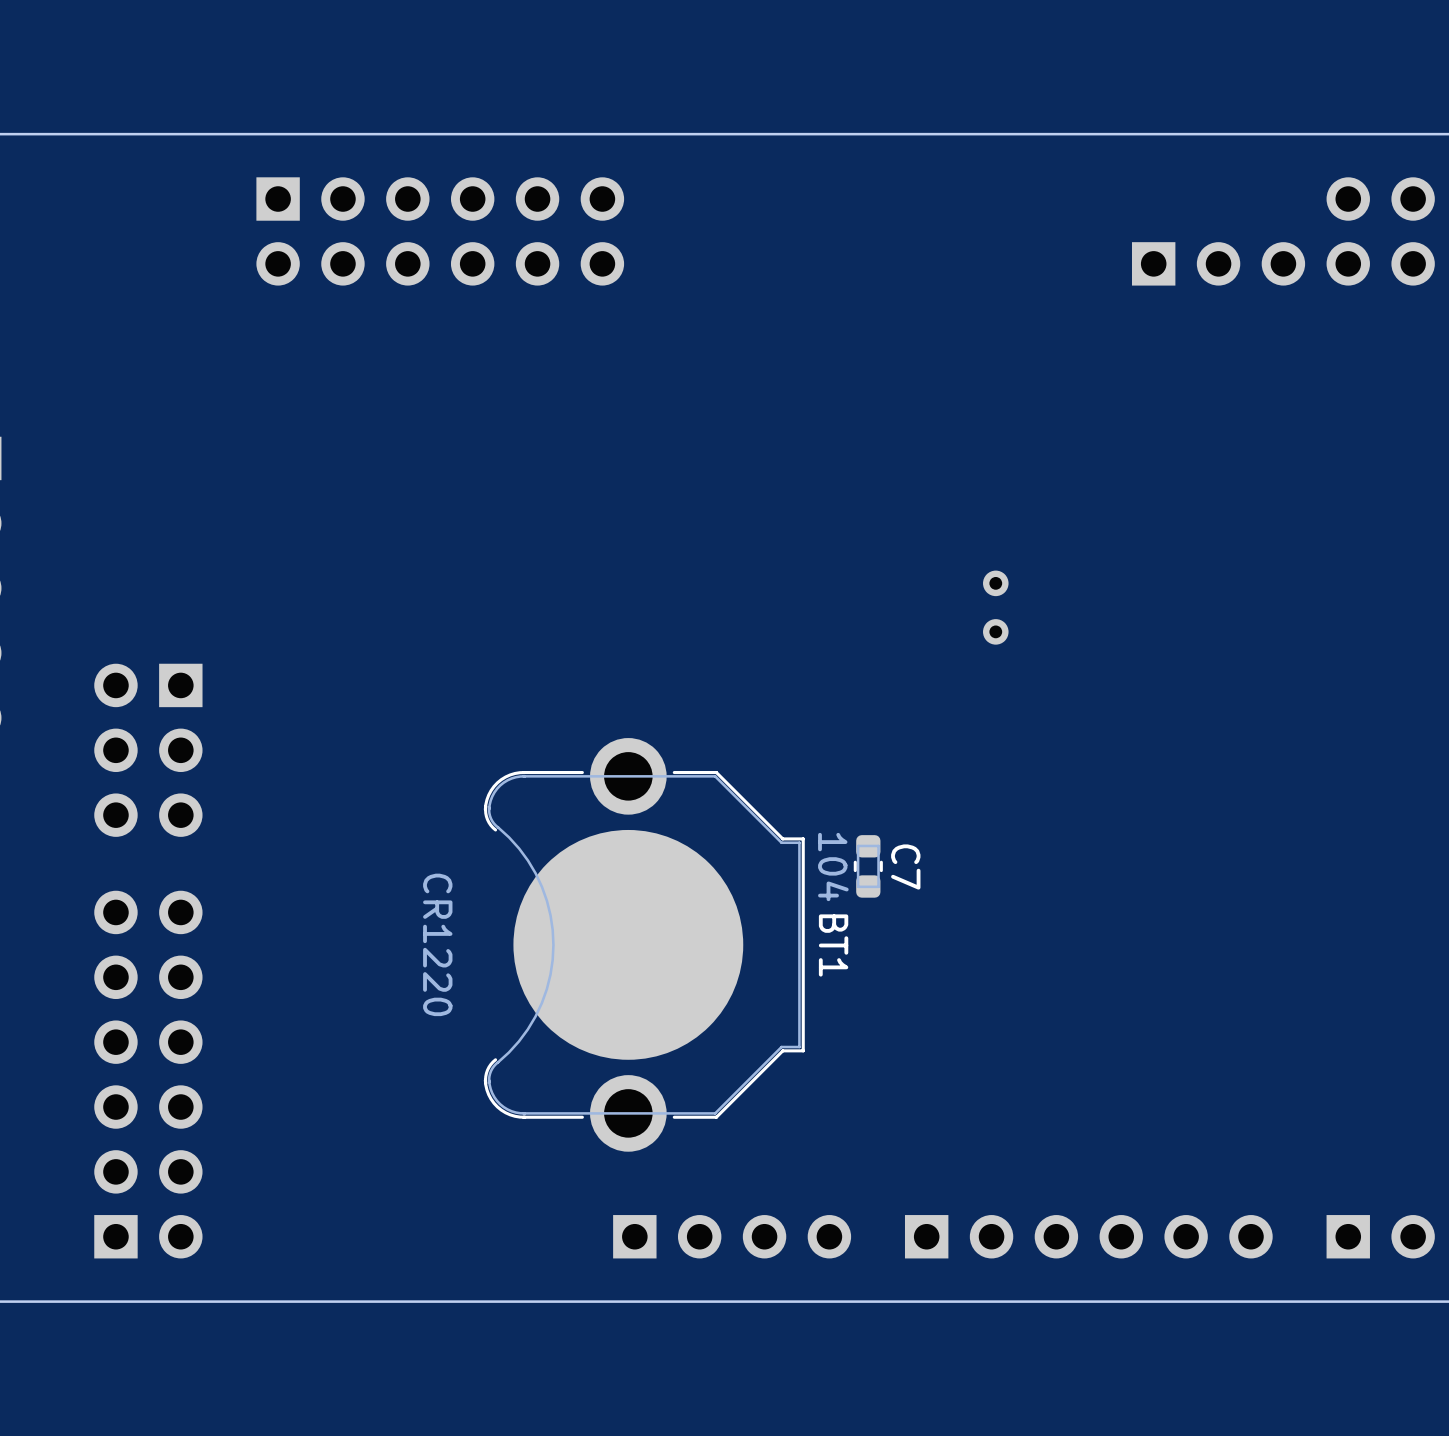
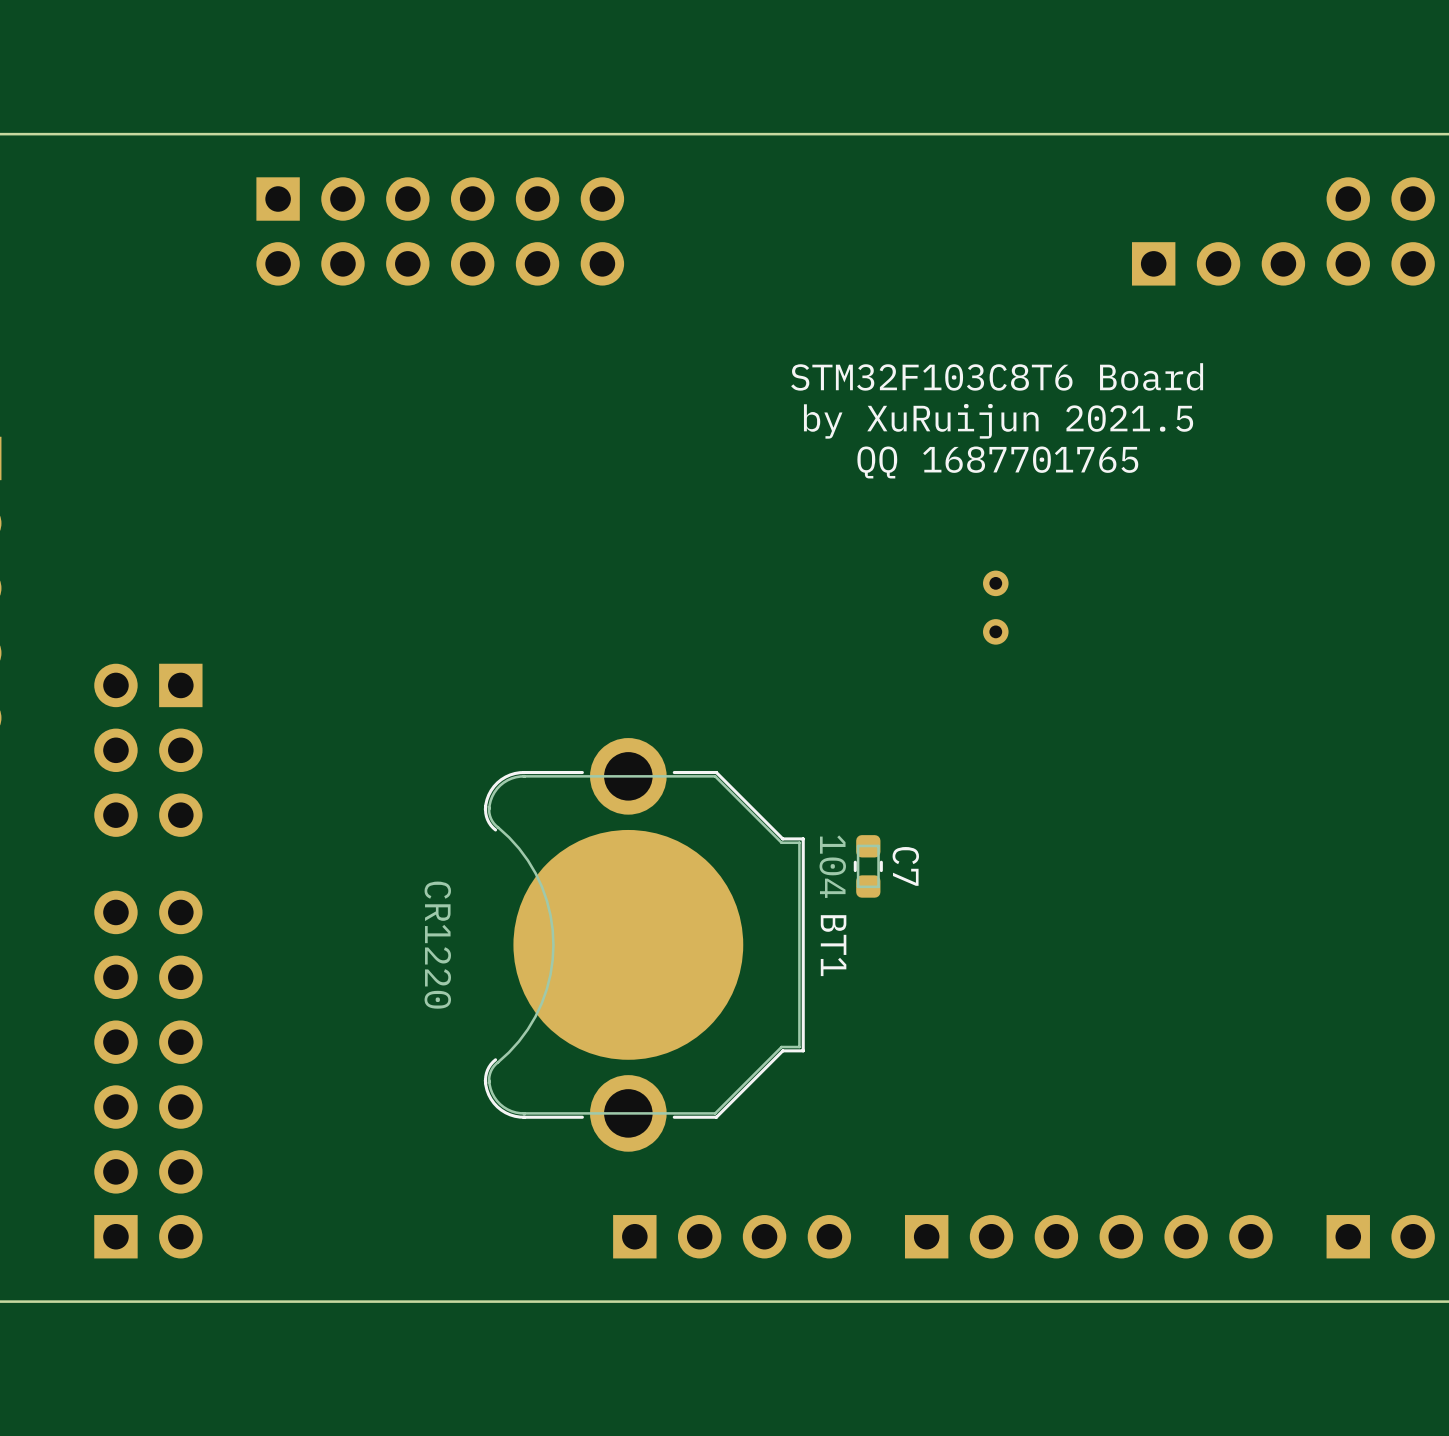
text: none -> STM32F103C8T6 Board (997, 376)
text: none -> by XuRuijun 2021.5 (998, 421)
text: none -> QQ 1687701765 (997, 462)

